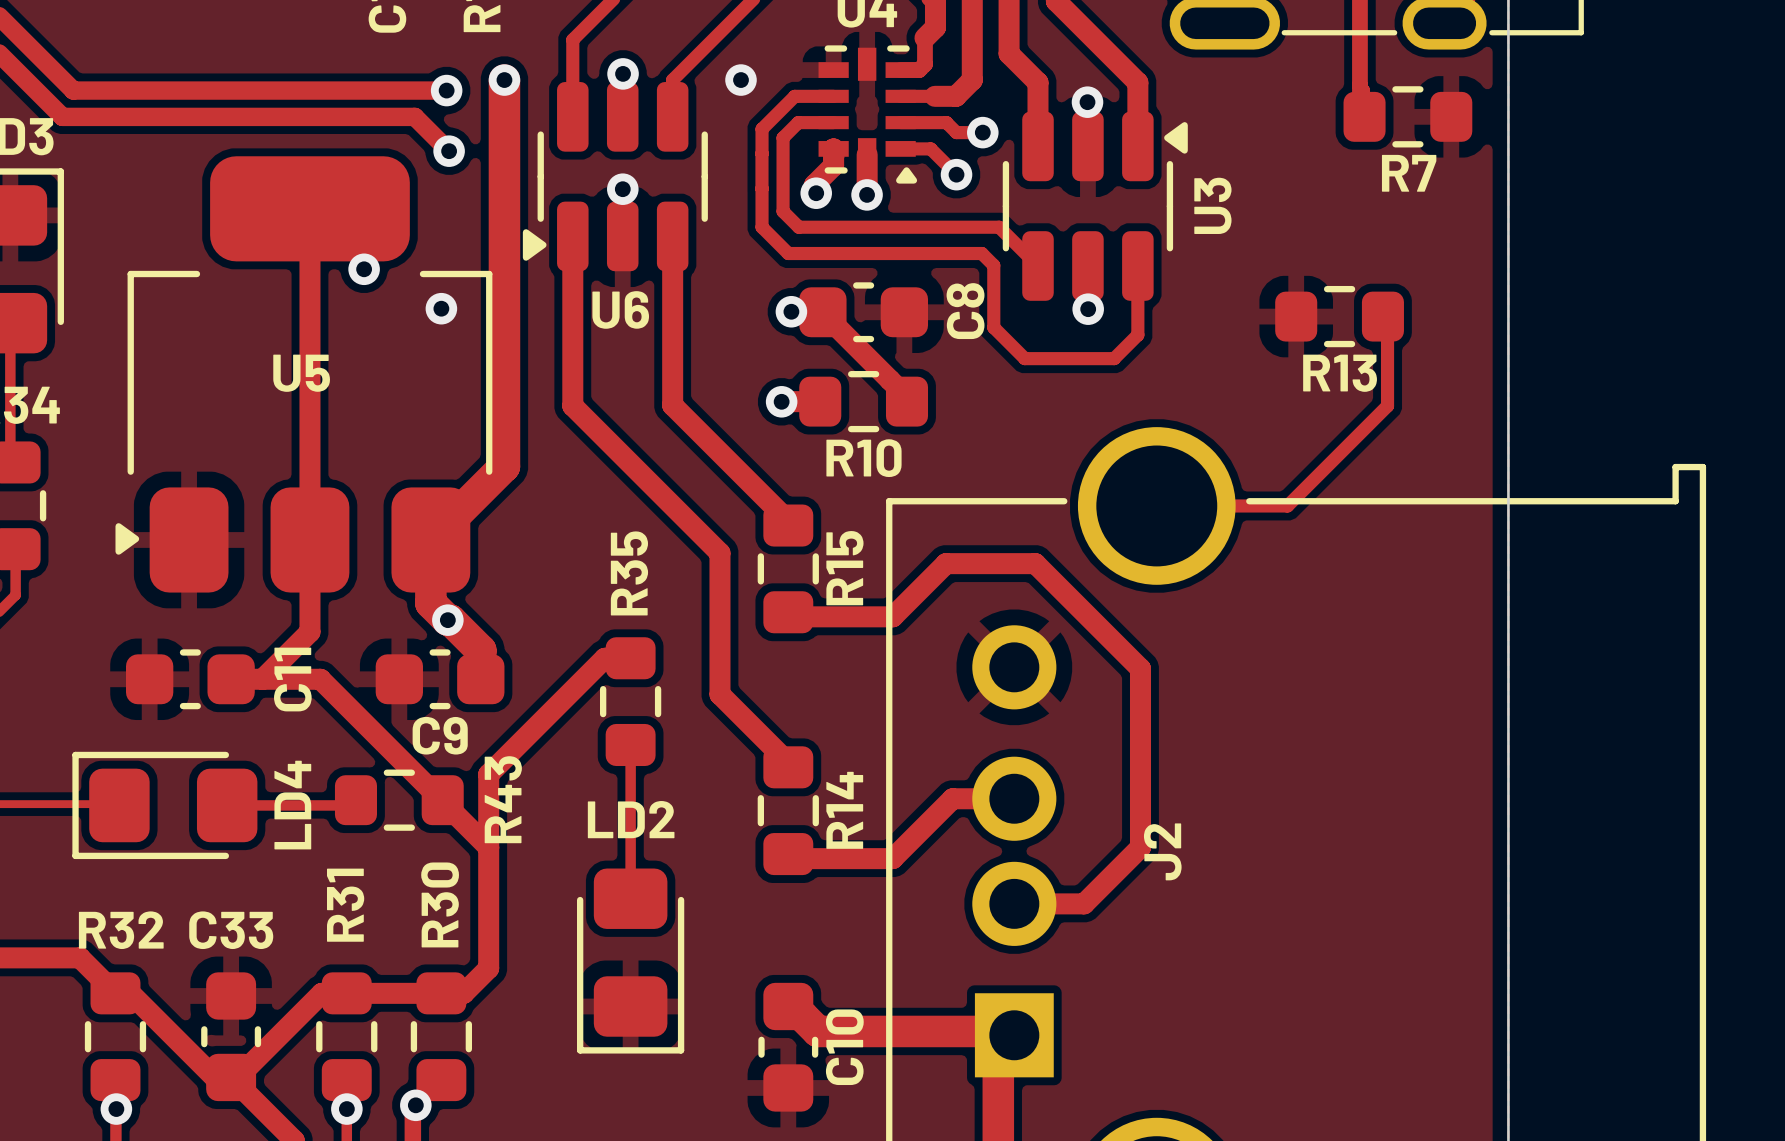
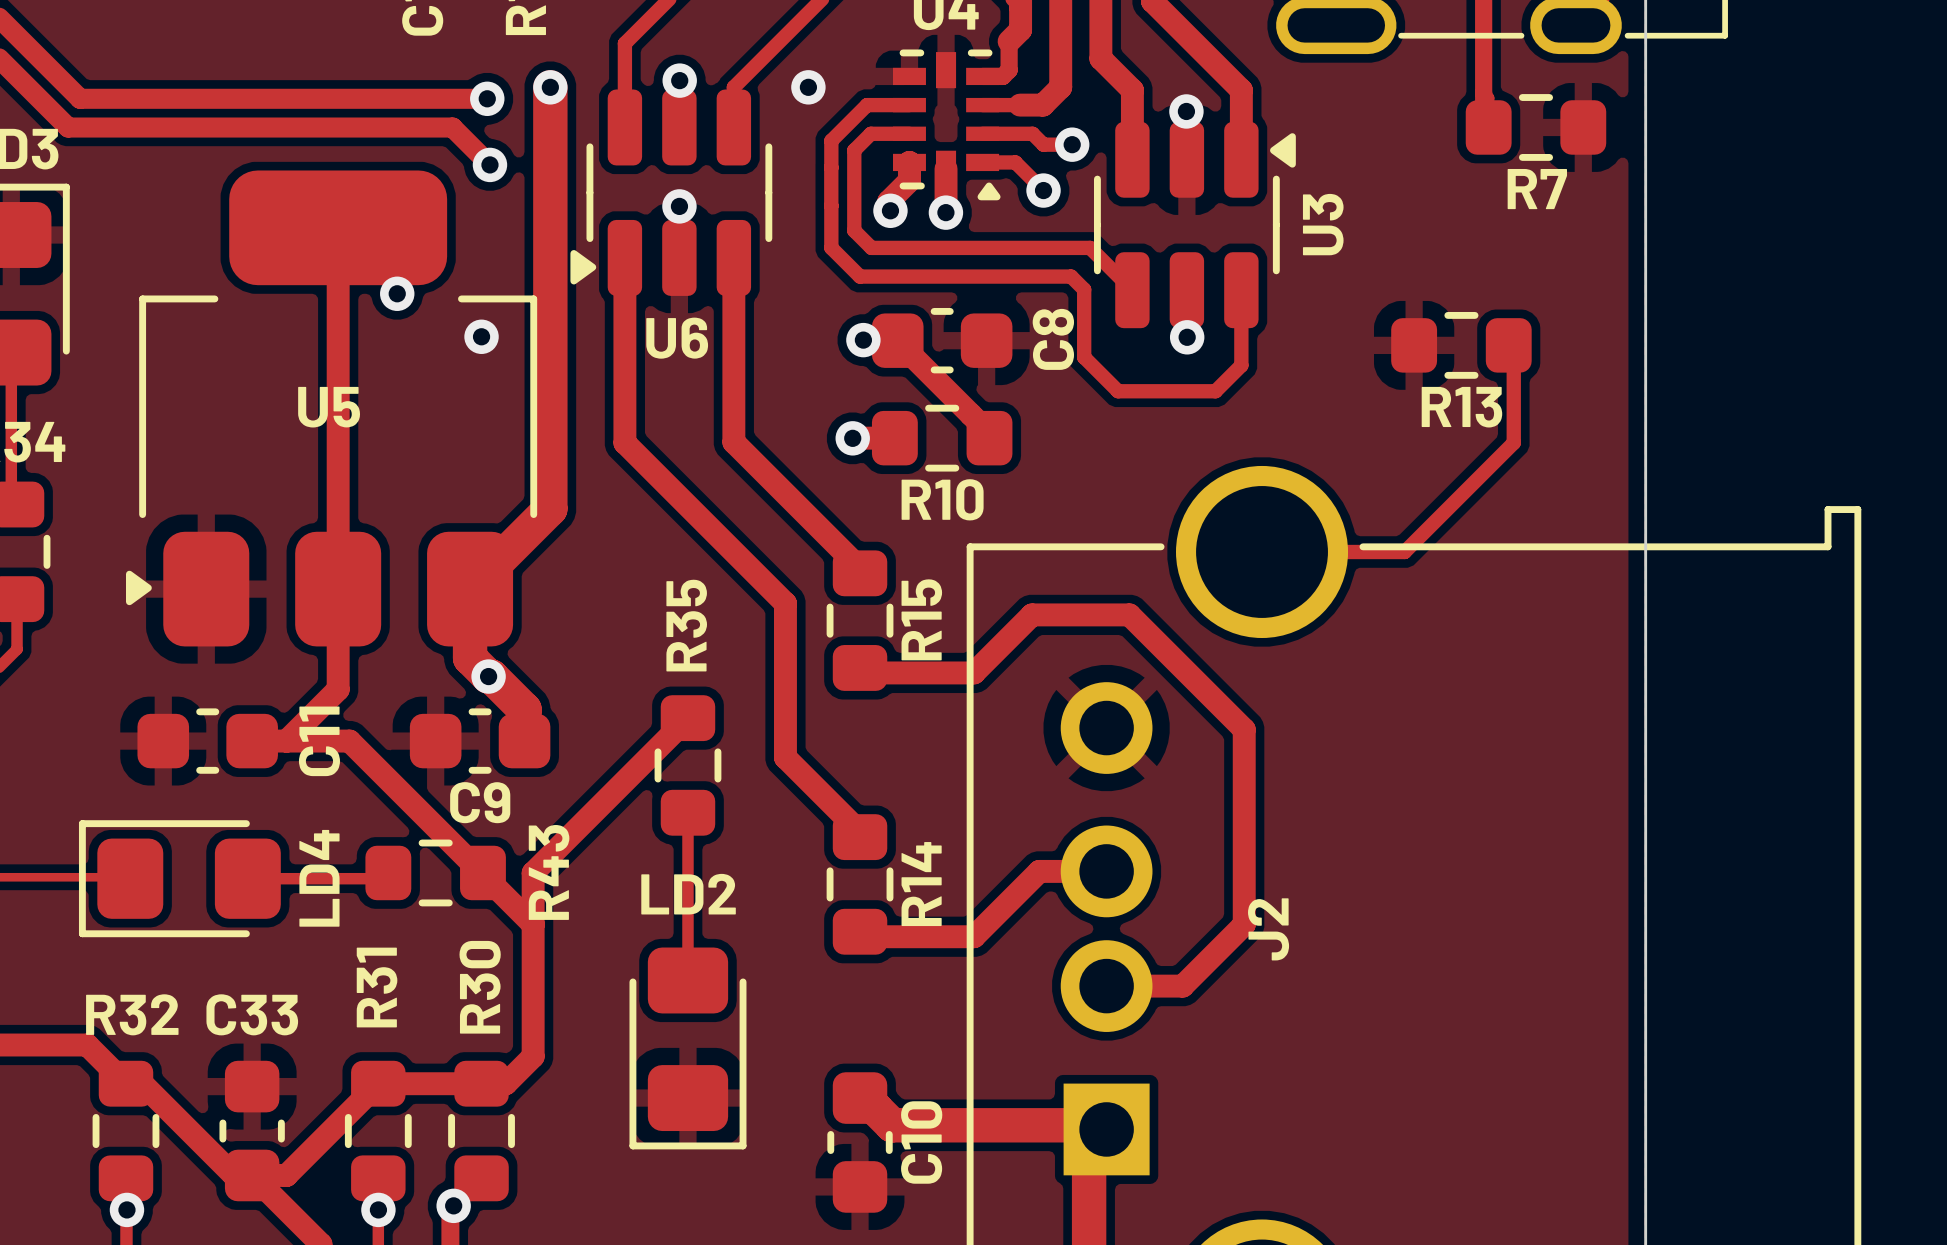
track: (630, 658) (604, 658) (488, 774) (488, 800) -> (687, 718) (533, 872)
track: (346, 993) (321, 993) (237, 1077) -> (378, 1083) (286, 1175) (252, 1175)

